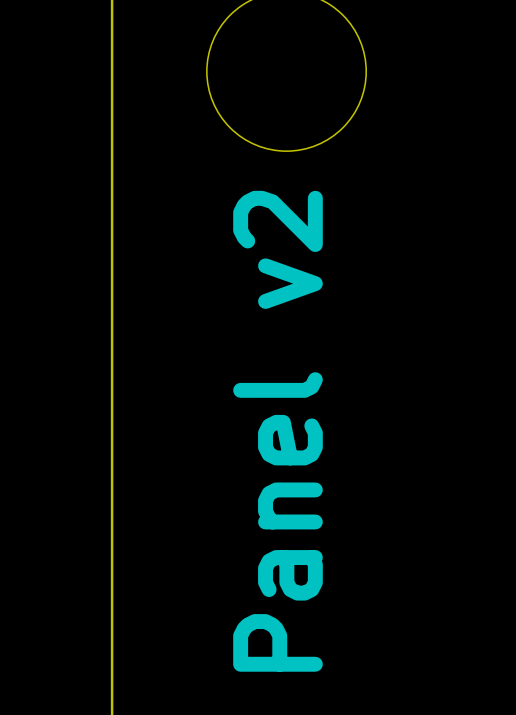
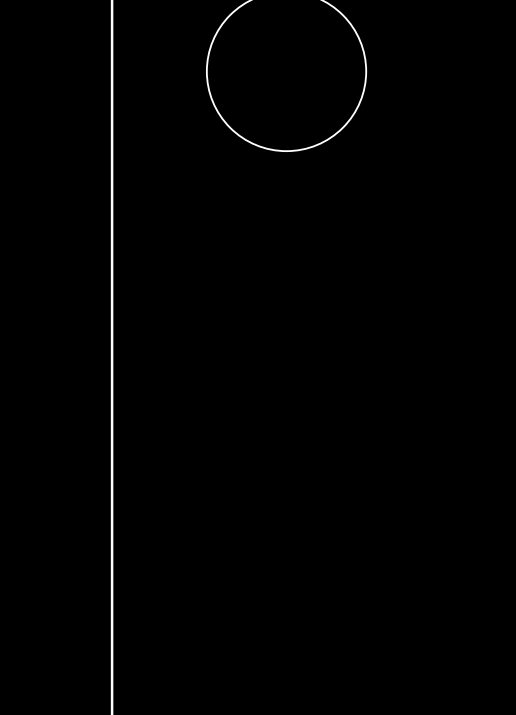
text: Panel v2 (277, 431) -> none

